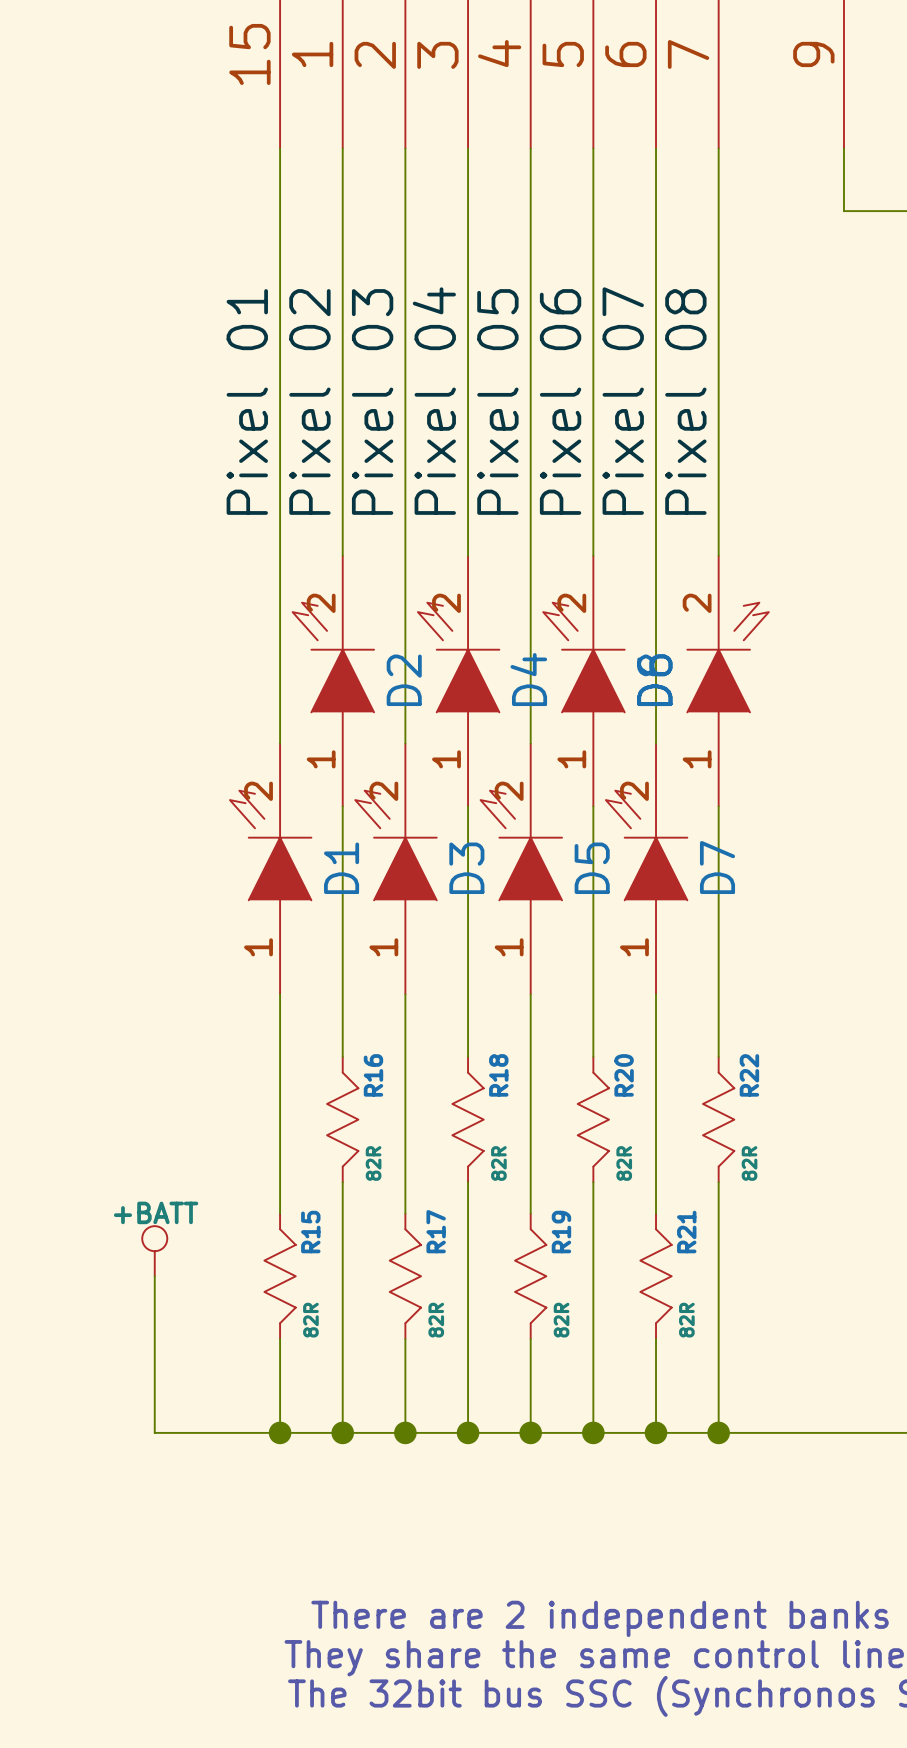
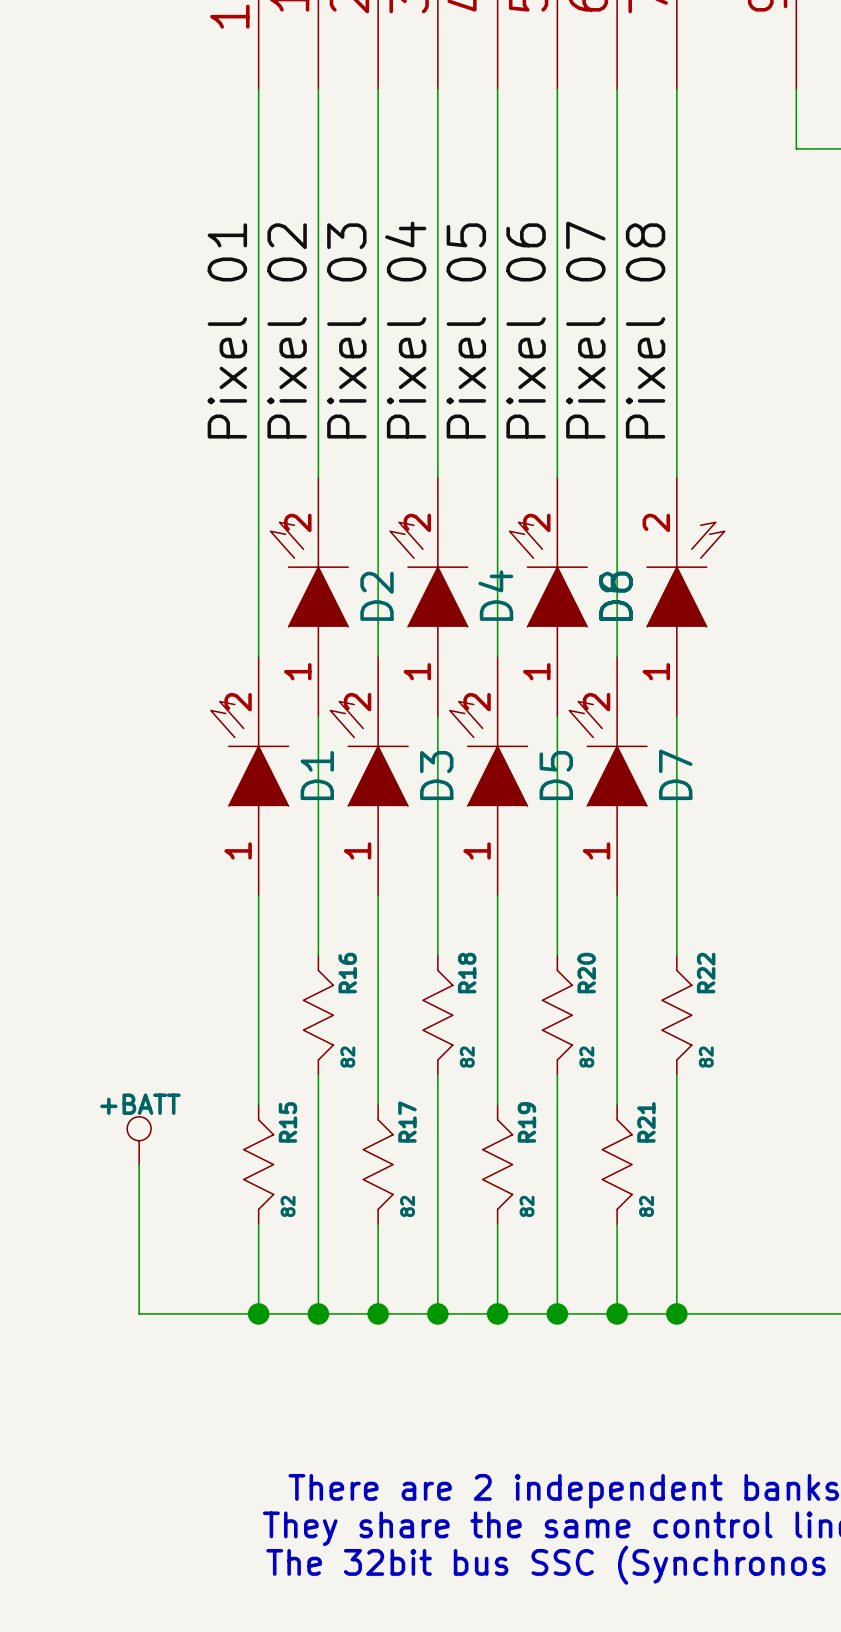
R16 value: 82R (373, 1163) -> 82 (347, 1057)
R18 value: 82R (498, 1163) -> 82 (467, 1057)
R20 value: 82R (624, 1163) -> 82 (586, 1057)
R22 value: 82R (749, 1163) -> 82 (706, 1057)
R15 value: 82R (310, 1320) -> 82 (288, 1206)
R17 value: 82R (436, 1320) -> 82 (407, 1206)
R19 value: 82R (561, 1320) -> 82 (527, 1206)
R21 value: 82R (686, 1320) -> 82 (646, 1206)

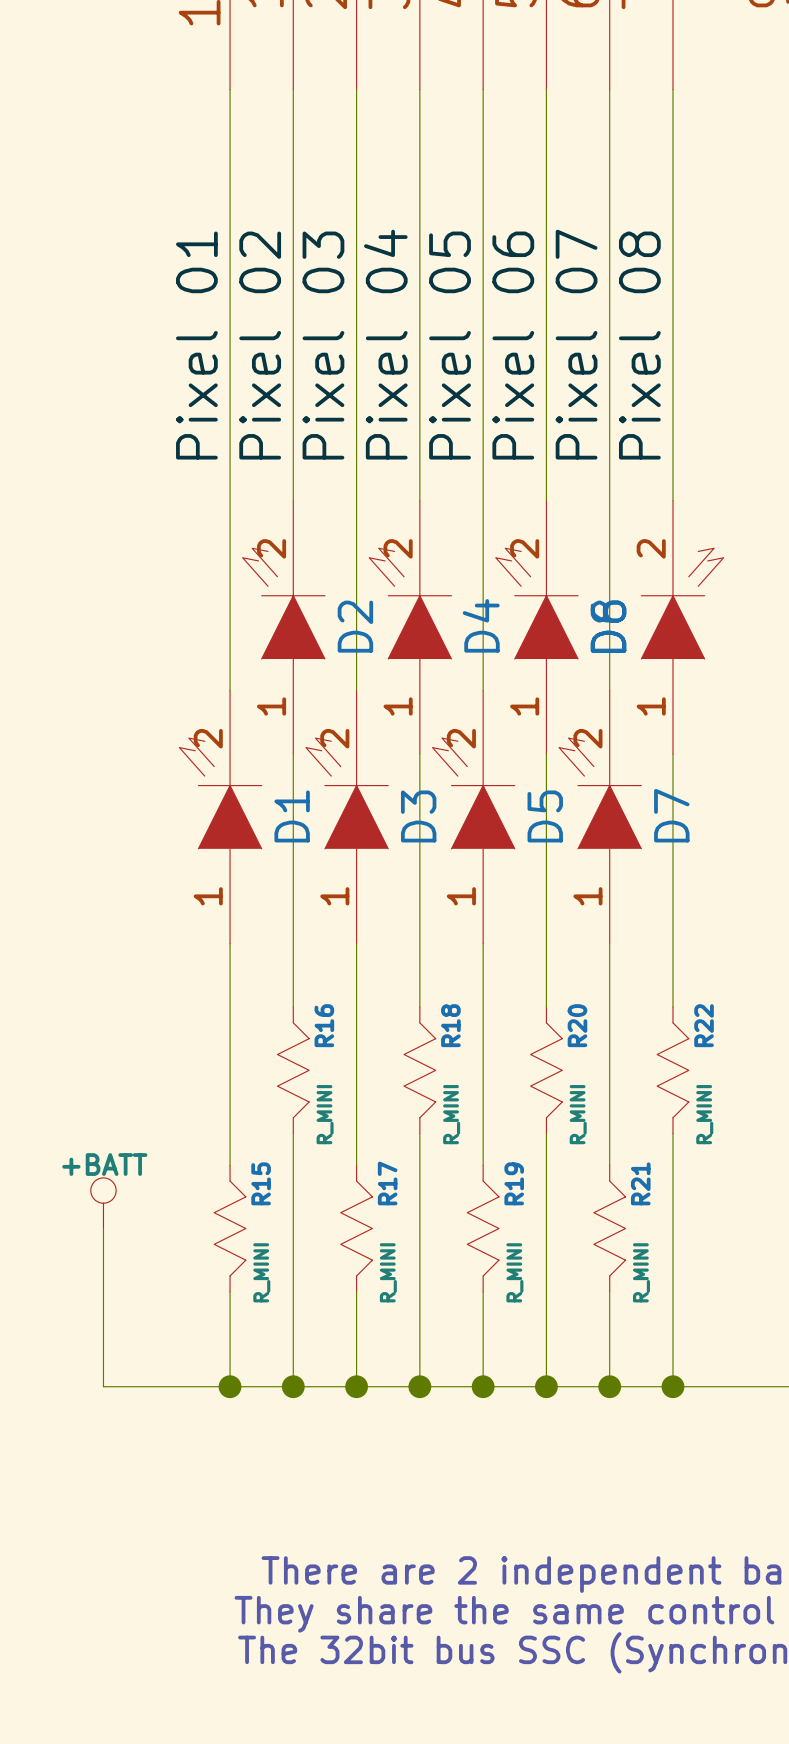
R16 value: 82 (347, 1057) -> R_MINI (325, 1114)
R18 value: 82 (467, 1057) -> R_MINI (451, 1114)
R20 value: 82 (586, 1057) -> R_MINI (578, 1114)
R22 value: 82 (706, 1057) -> R_MINI (704, 1114)
R15 value: 82 (288, 1206) -> R_MINI (261, 1272)
R17 value: 82 (407, 1206) -> R_MINI (388, 1272)
R19 value: 82 (527, 1206) -> R_MINI (514, 1272)
R21 value: 82 (646, 1206) -> R_MINI (641, 1272)

